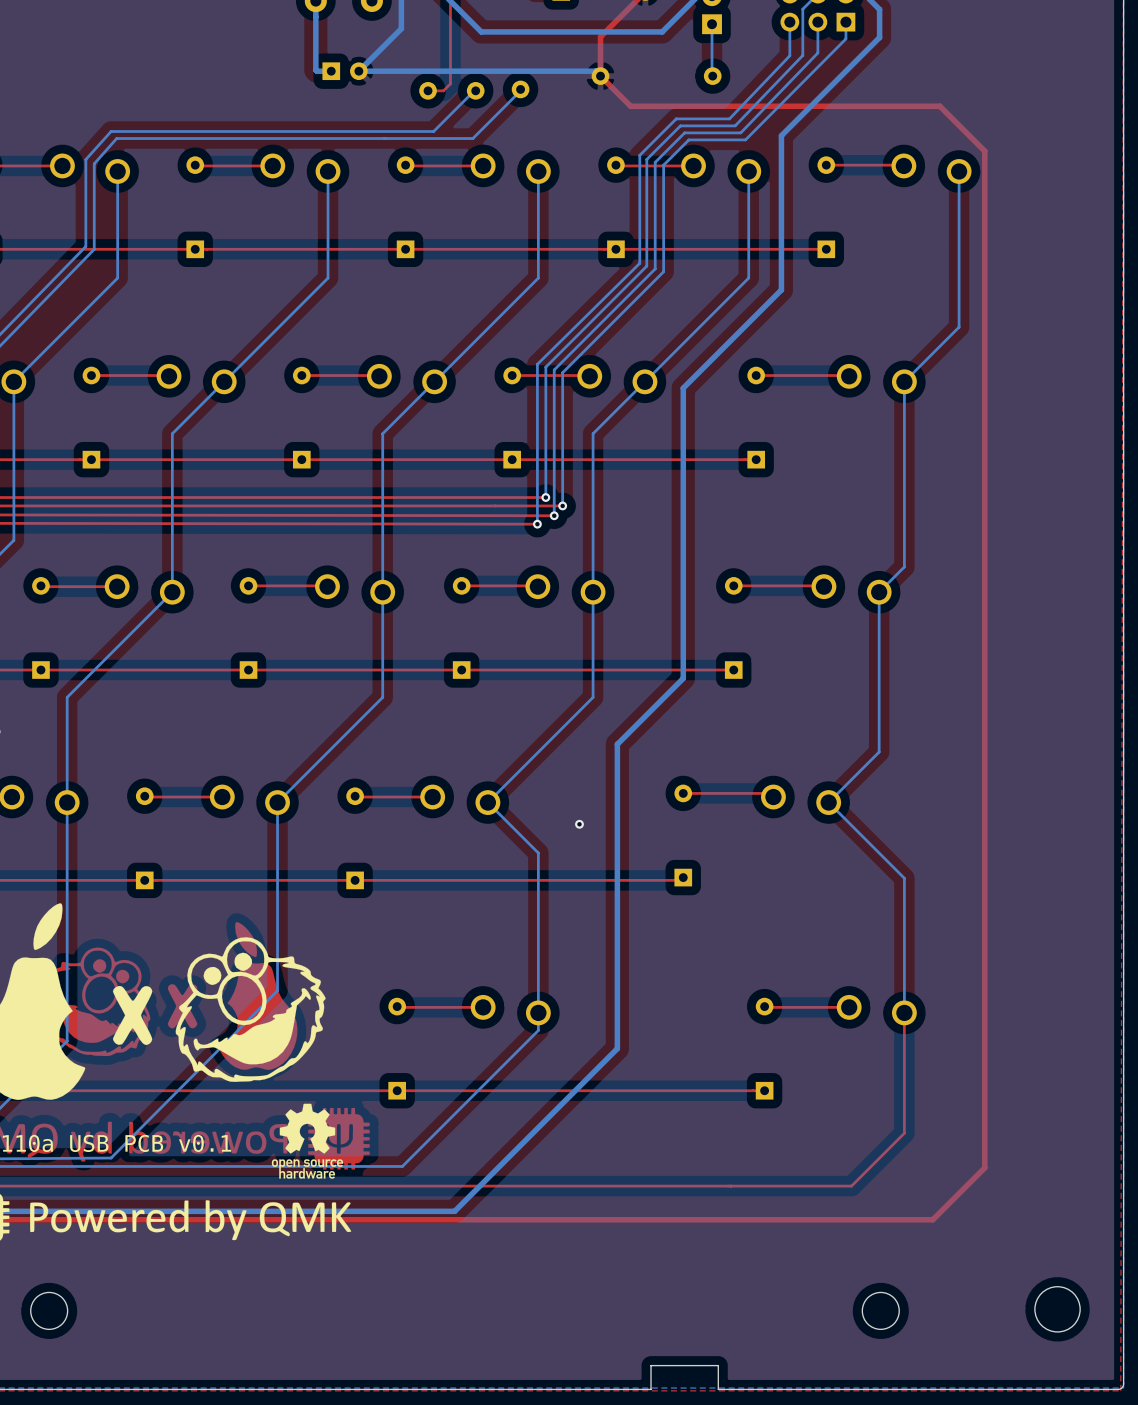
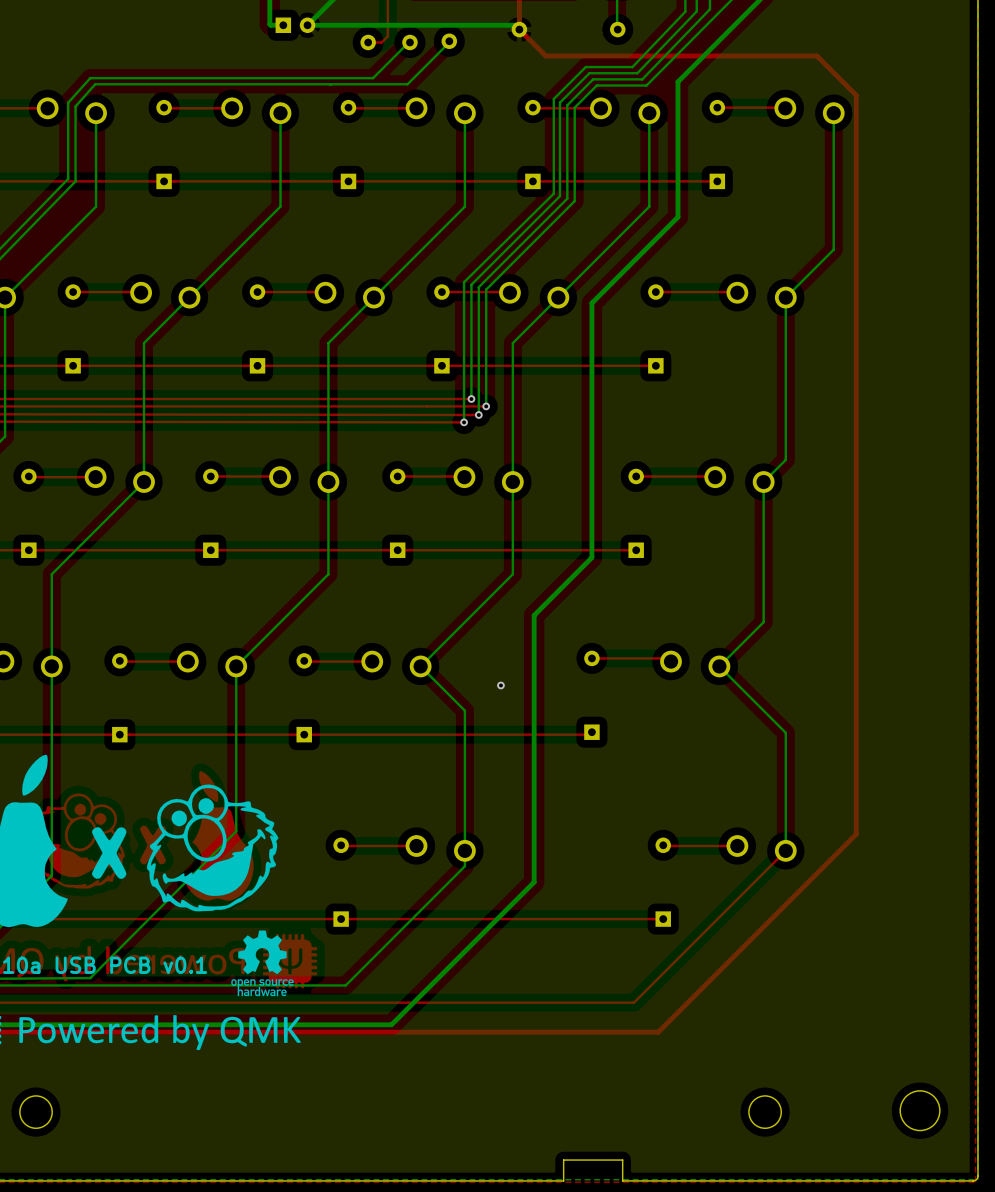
top track: (984, 993) (984, 1167) (932, 1219) (758, 1219) -> (856, 834) (658, 1032)
top track: (904, 1012) (904, 1133) (851, 1186) (731, 1186) -> (785, 850) (633, 1002)

